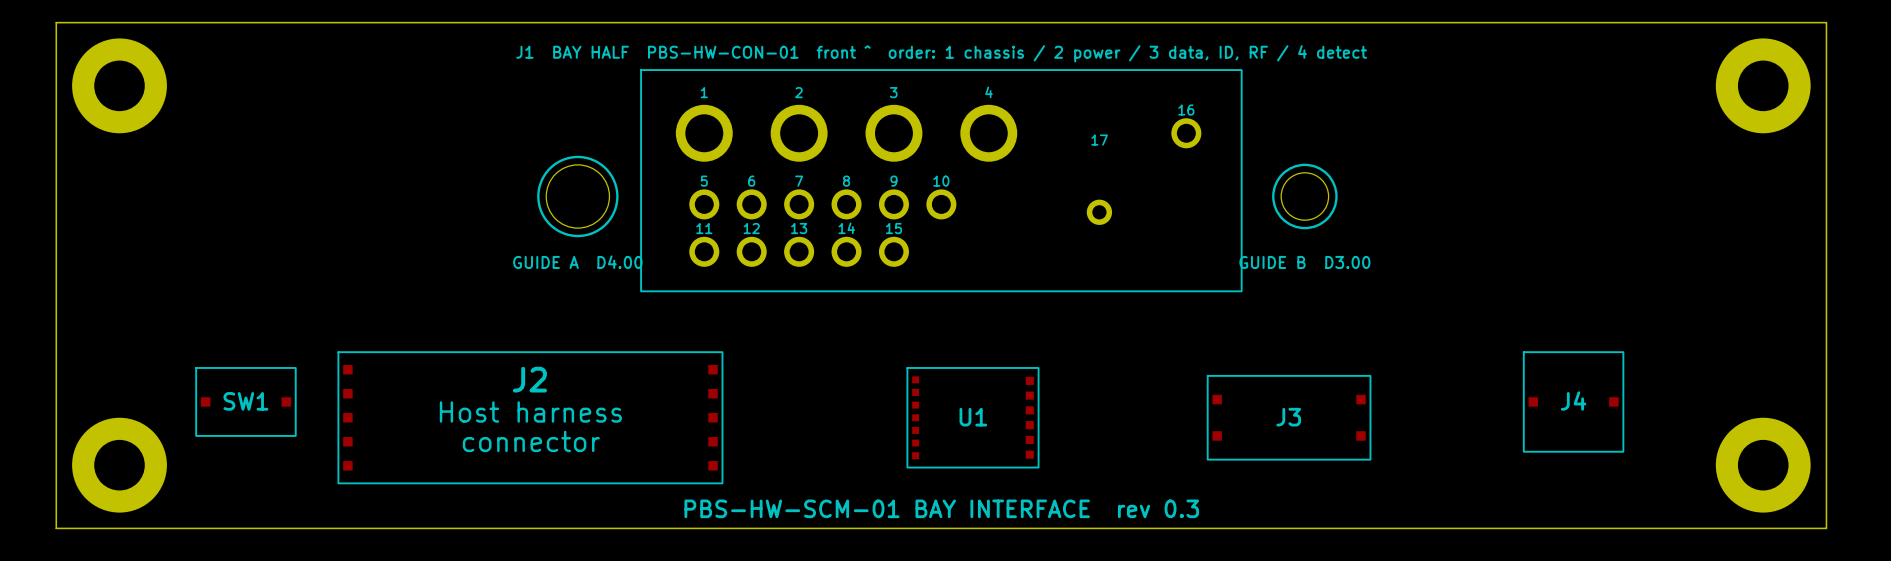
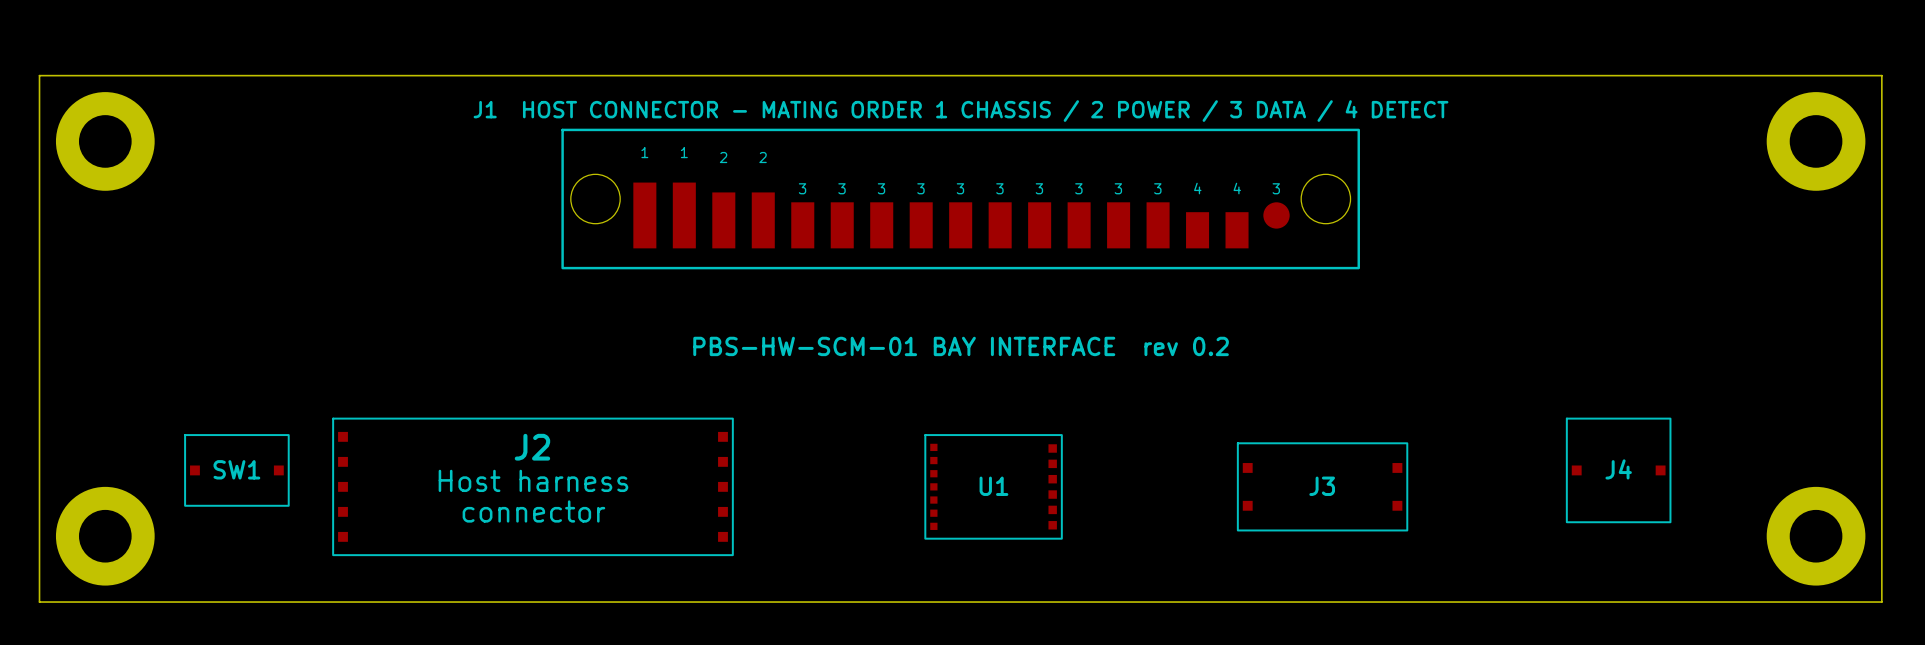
part: none -> (960, 199)
part: (937, 180) -> none
text: none -> PBS-HW-SCM-01 BAY INTERFACE rev 0.2 (961, 346)
text: PBS-HW-SCM-01 BAY INTERFACE rev 0.3 (941, 508) -> none

